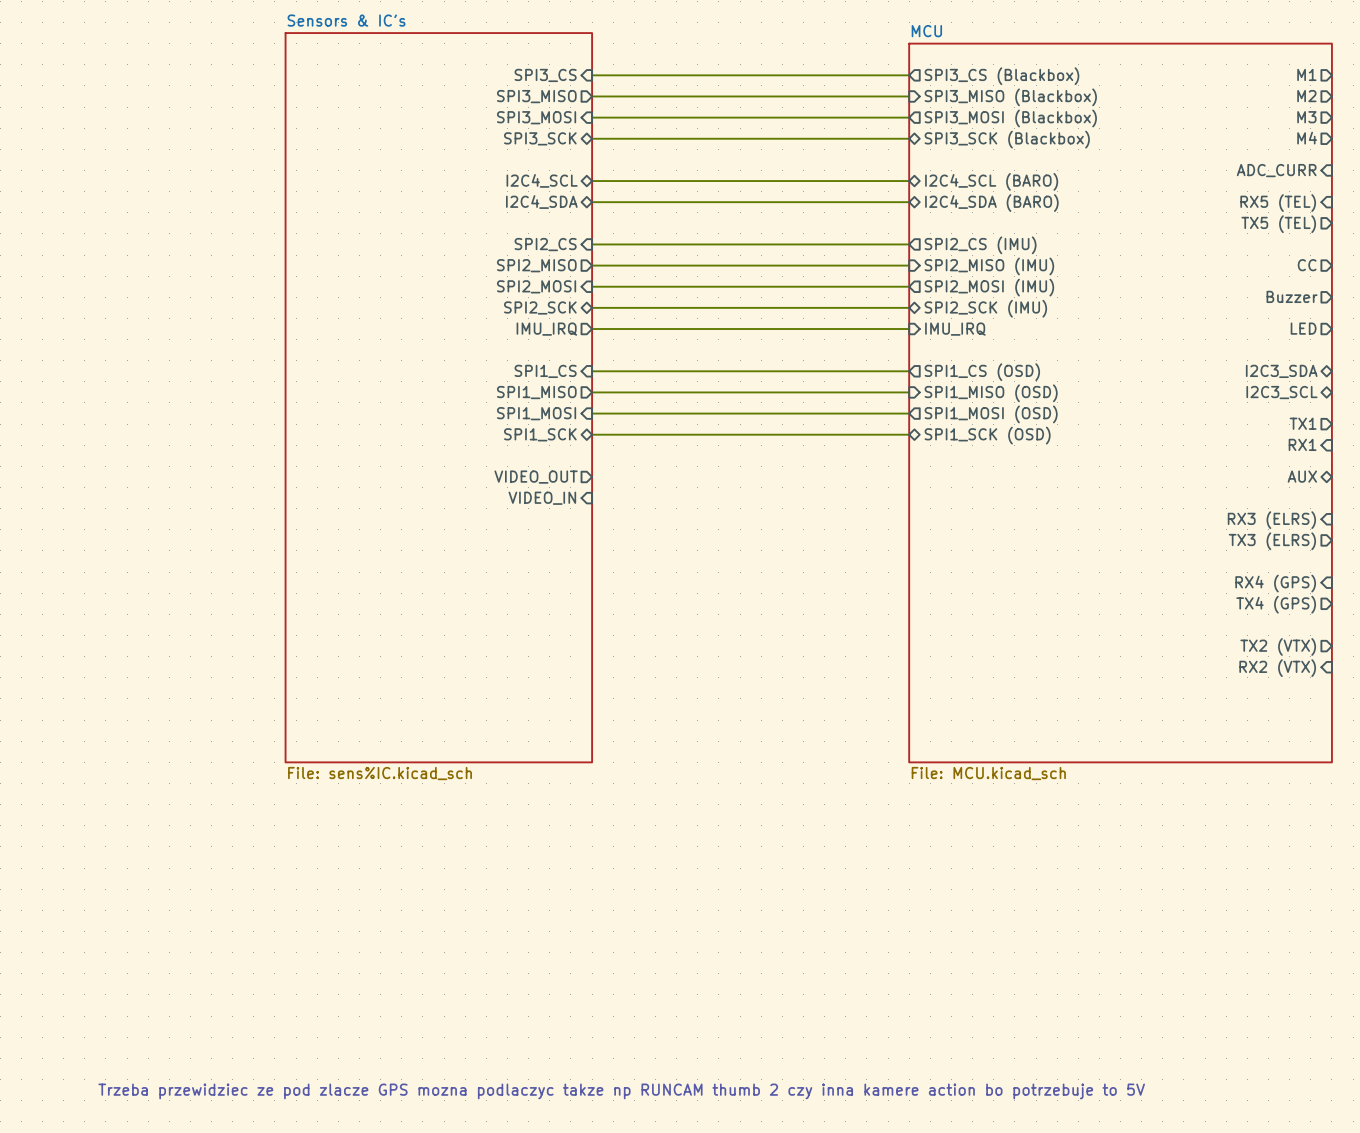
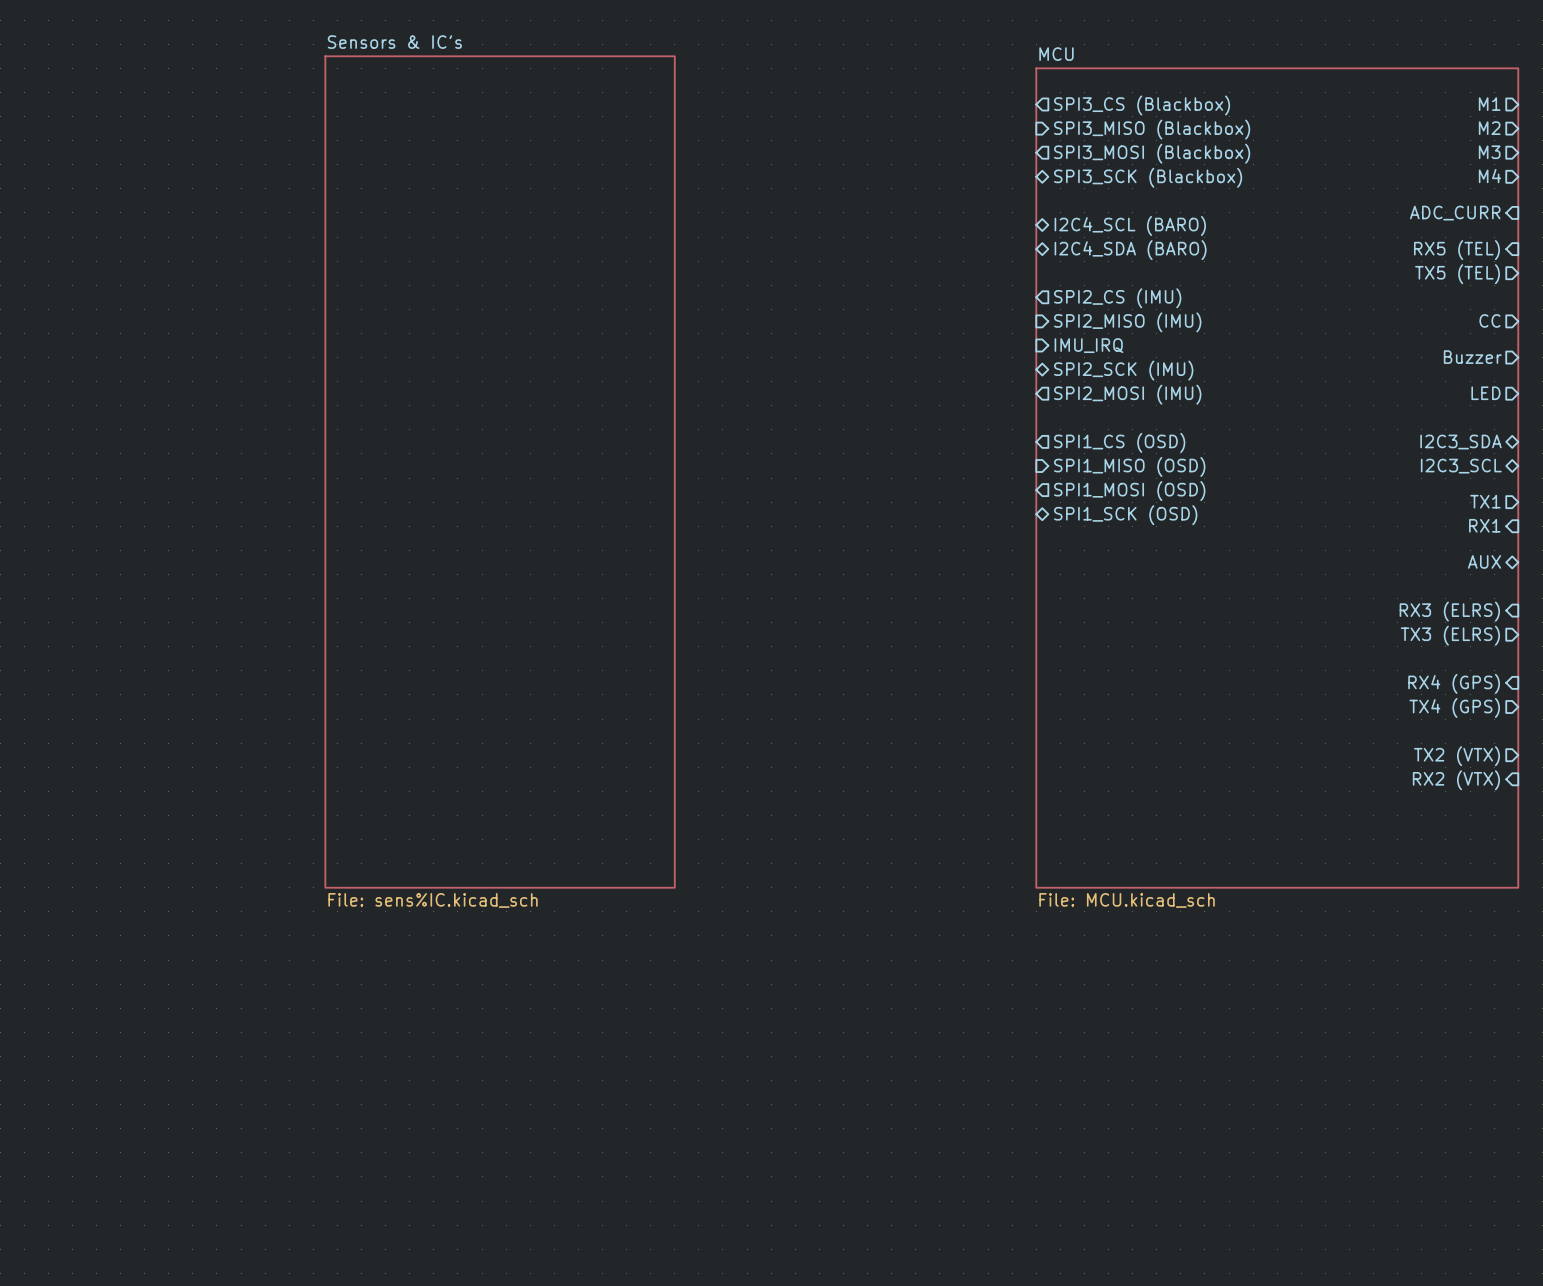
sheet pin: SPI3_CS (545, 75) -> none
wire: (592, 75) (909, 75) -> none
sheet pin: SPI3_MISO (536, 96) -> none
wire: (592, 96) (909, 96) -> none
sheet pin: SPI3_MOSI (536, 117) -> none
wire: (592, 117) (909, 117) -> none
sheet pin: SPI3_SCK (540, 138) -> none
wire: (592, 138) (909, 138) -> none
sheet pin: I2C4_SCL (542, 180) -> none
wire: (592, 181) (909, 181) -> none
sheet pin: I2C4_SDA (541, 202) -> none
wire: (592, 202) (909, 202) -> none
sheet pin: SPI2_CS (545, 244) -> none
wire: (592, 244) (909, 244) -> none
sheet pin: SPI2_MISO (536, 265) -> none
wire: (592, 265) (909, 265) -> none
sheet pin: SPI2_MOSI (536, 286) -> none
wire: (592, 286) (909, 286) -> none
sheet pin shape: output (989, 287) -> input (1088, 345)
sheet pin: SPI2_MOSI (IMU) (989, 287) -> IMU_IRQ (1088, 345)
sheet pin: SPI2_SCK (540, 307) -> none
wire: (592, 307) (909, 307) -> none
sheet pin: IMU_IRQ (546, 329) -> none
wire: (592, 329) (909, 329) -> none
sheet pin shape: input (955, 329) -> output (1127, 394)
sheet pin: IMU_IRQ (955, 329) -> SPI2_MOSI (IMU) (1127, 394)
sheet pin: SPI1_CS (545, 371) -> none
wire: (592, 371) (909, 371) -> none
sheet pin: SPI1_MISO (536, 392) -> none
wire: (592, 392) (909, 392) -> none
sheet pin: SPI1_MOSI (536, 413) -> none
wire: (592, 413) (909, 413) -> none
sheet pin: SPI1_SCK (540, 434) -> none
wire: (592, 434) (909, 434) -> none
sheet pin: VIDEO_OUT (536, 477) -> none
sheet pin: VIDEO_IN (542, 498) -> none
text: Trzeba przewidziec ze pod zlacze GPS mozna podlaczyc takze np RUNCAM thumb 2 czy inna kamere action bo potrzebuje to 5V (621, 1091) -> none

